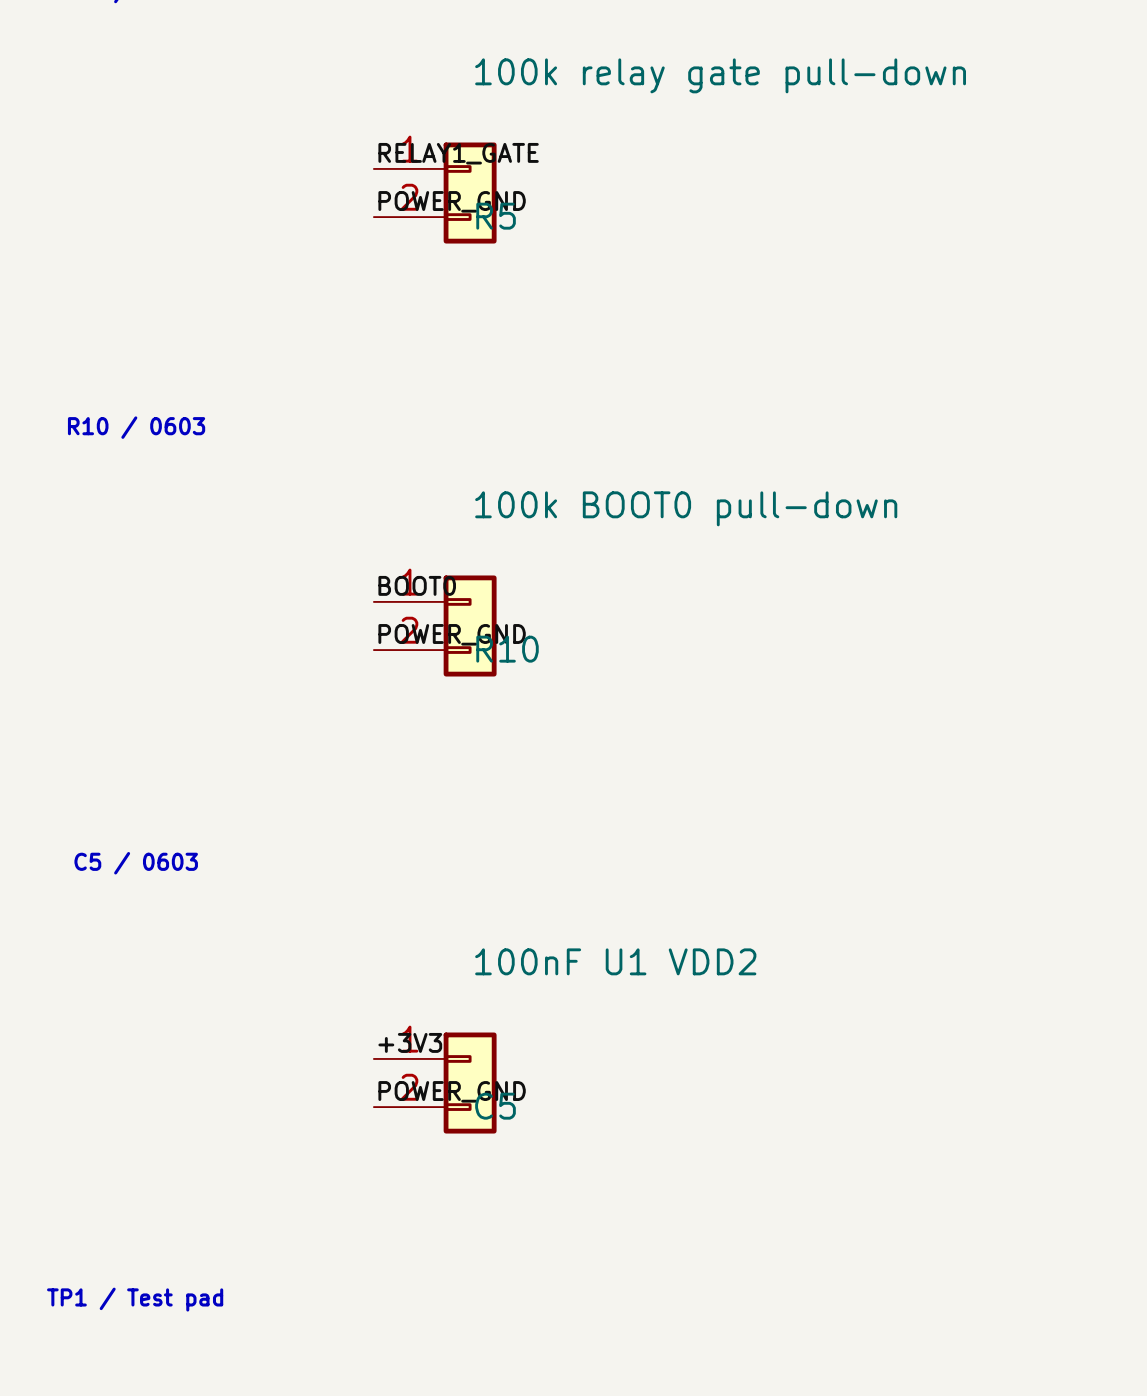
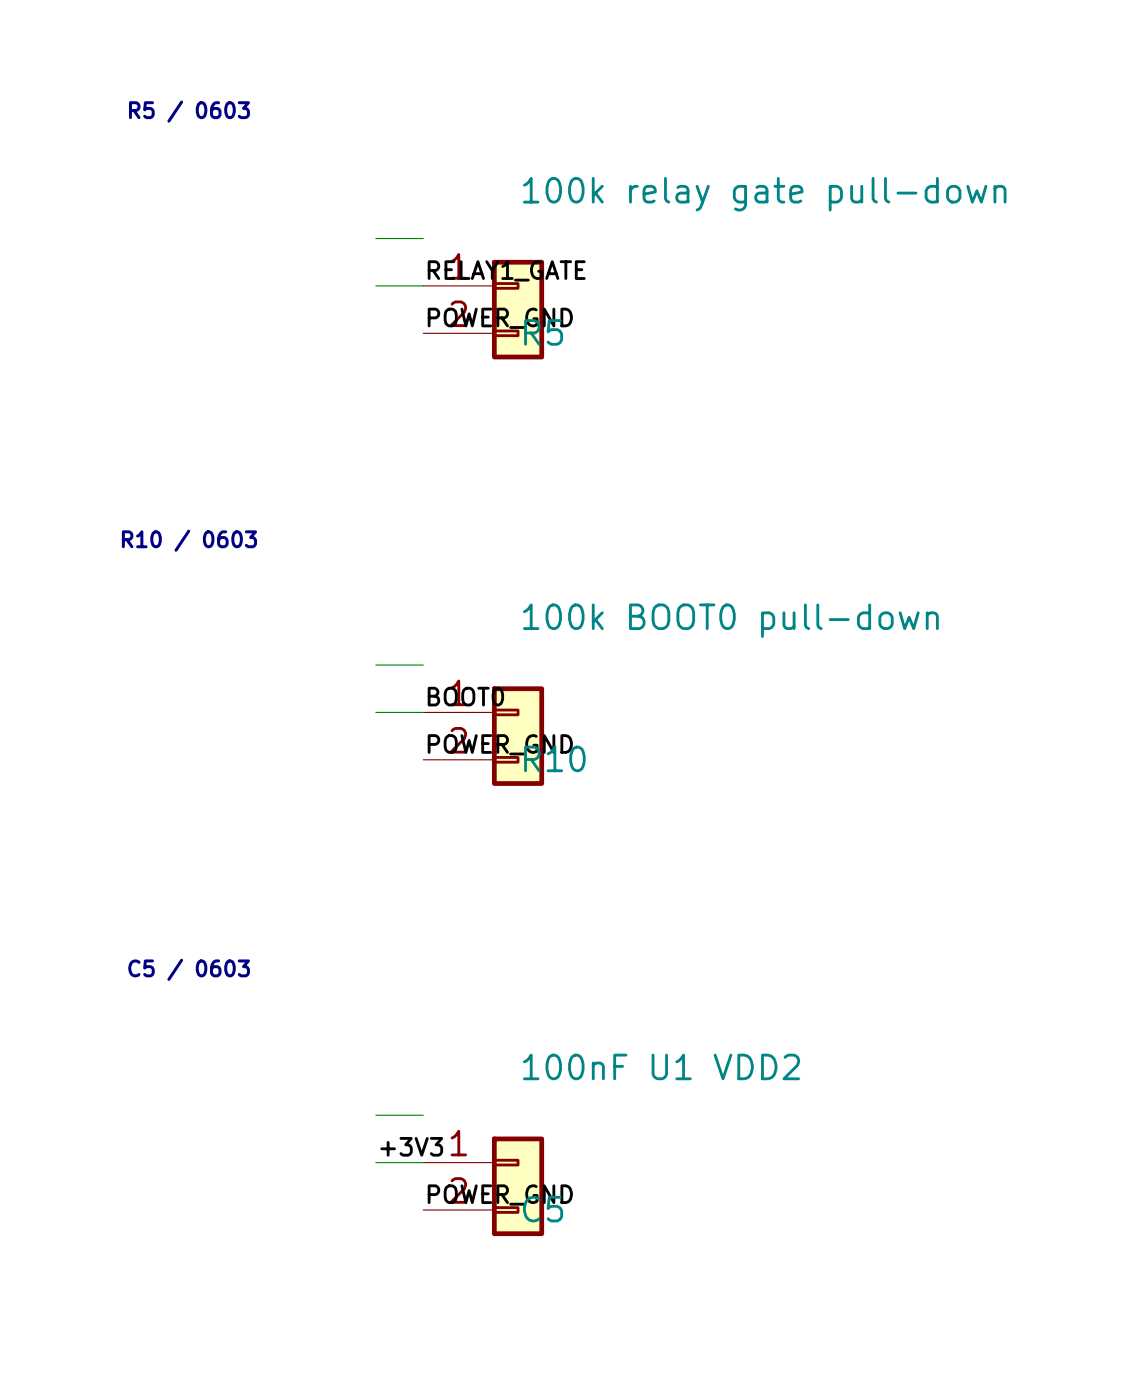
wire: none -> (375, 238) (423, 238)
wire: none -> (375, 285) (423, 285)
wire: none -> (375, 665) (423, 665)
wire: none -> (375, 712) (423, 712)
wire: none -> (375, 1115) (423, 1115)
label position: +3V3 (410, 1042) -> +3V3 (411, 1146)
wire: none -> (375, 1162) (423, 1162)

